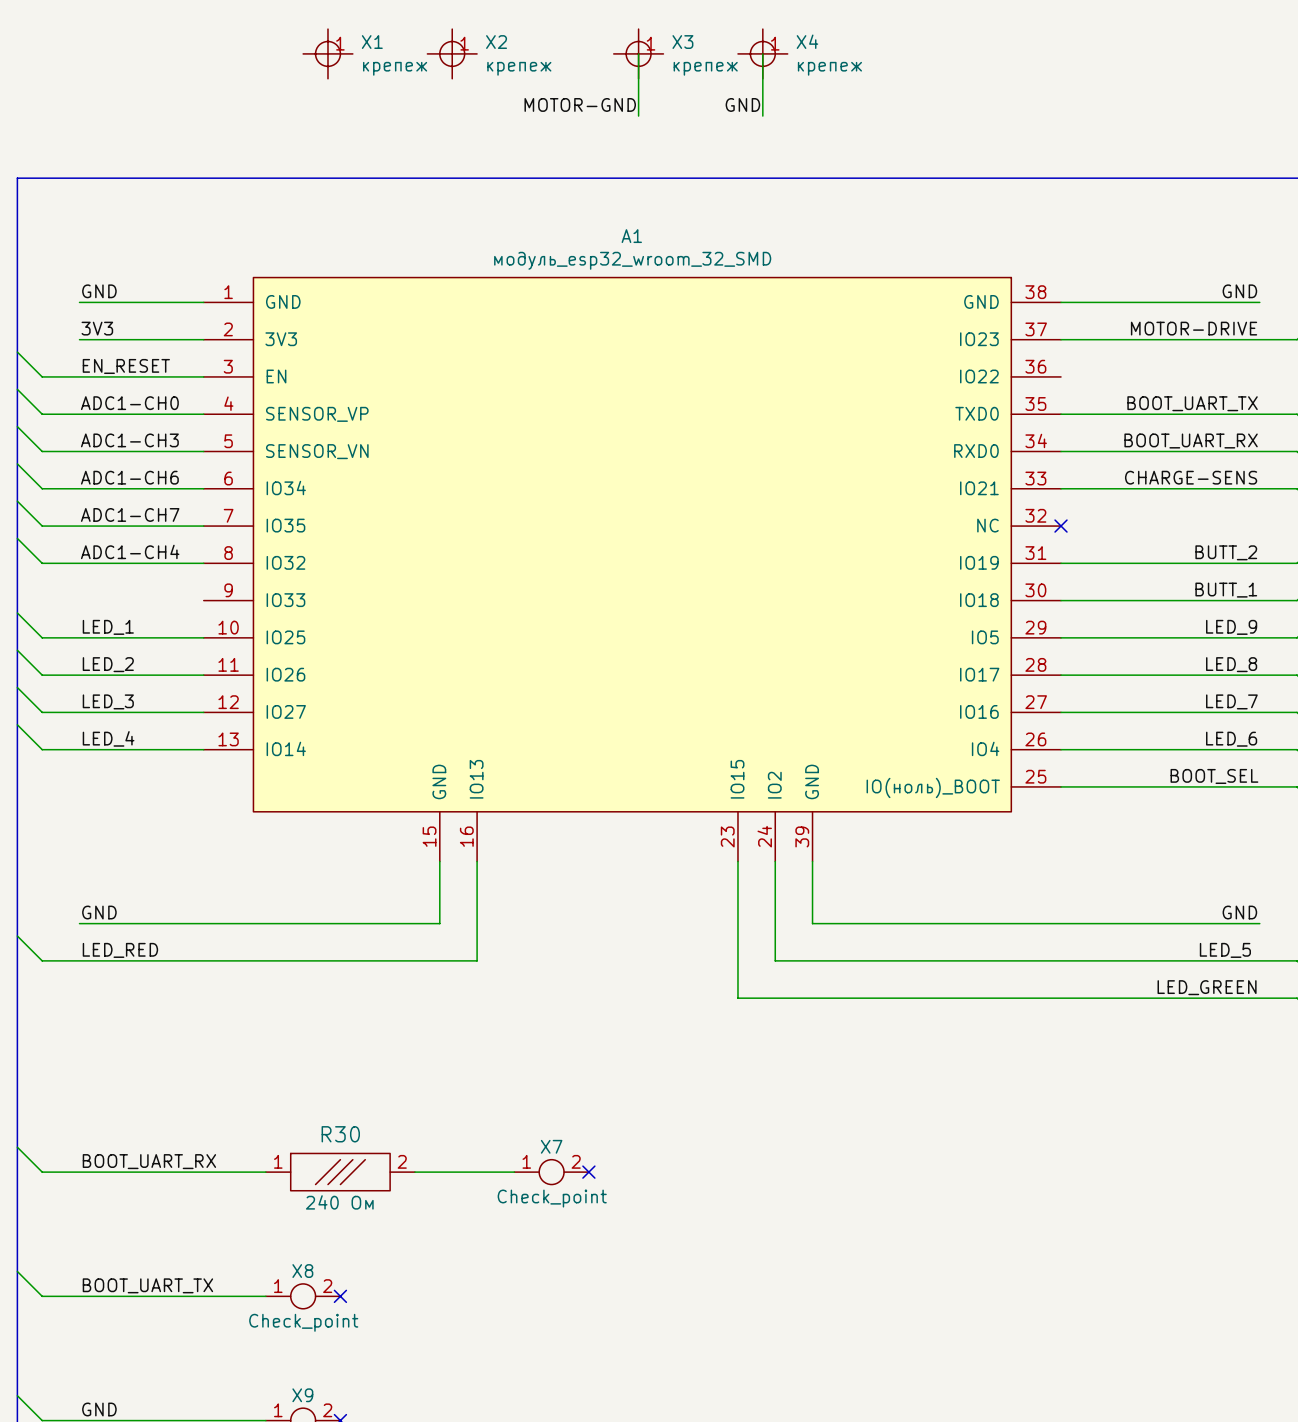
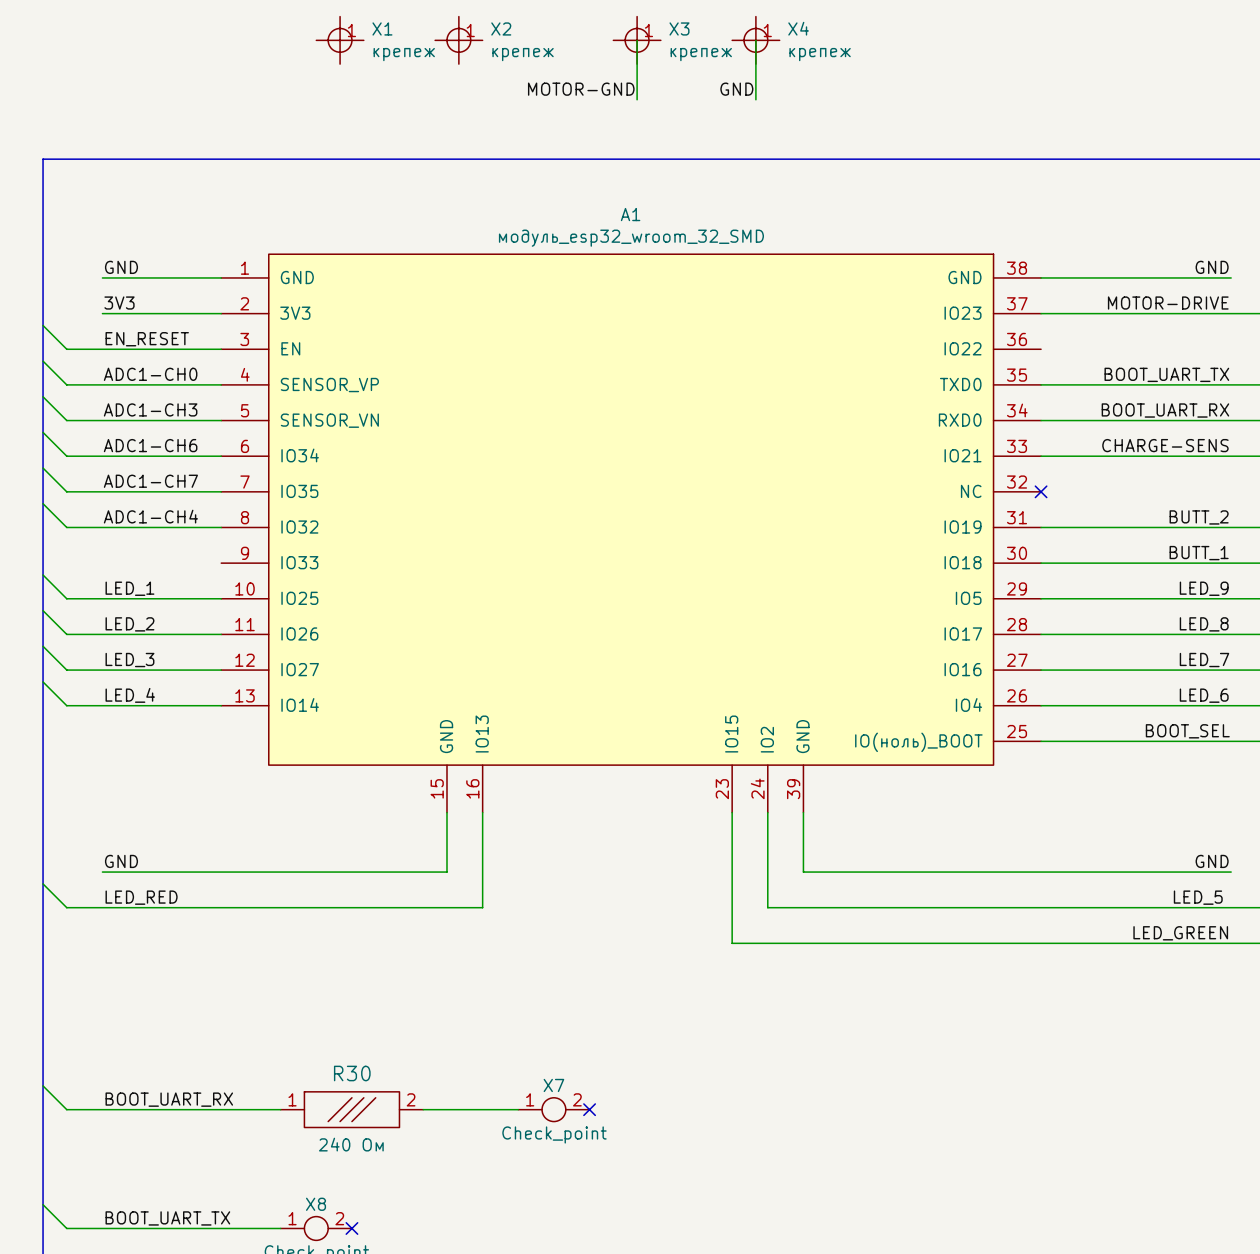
R30 text: 240 Ом (339, 1202) -> none
R30 text: none -> 240 Ом (351, 1144)

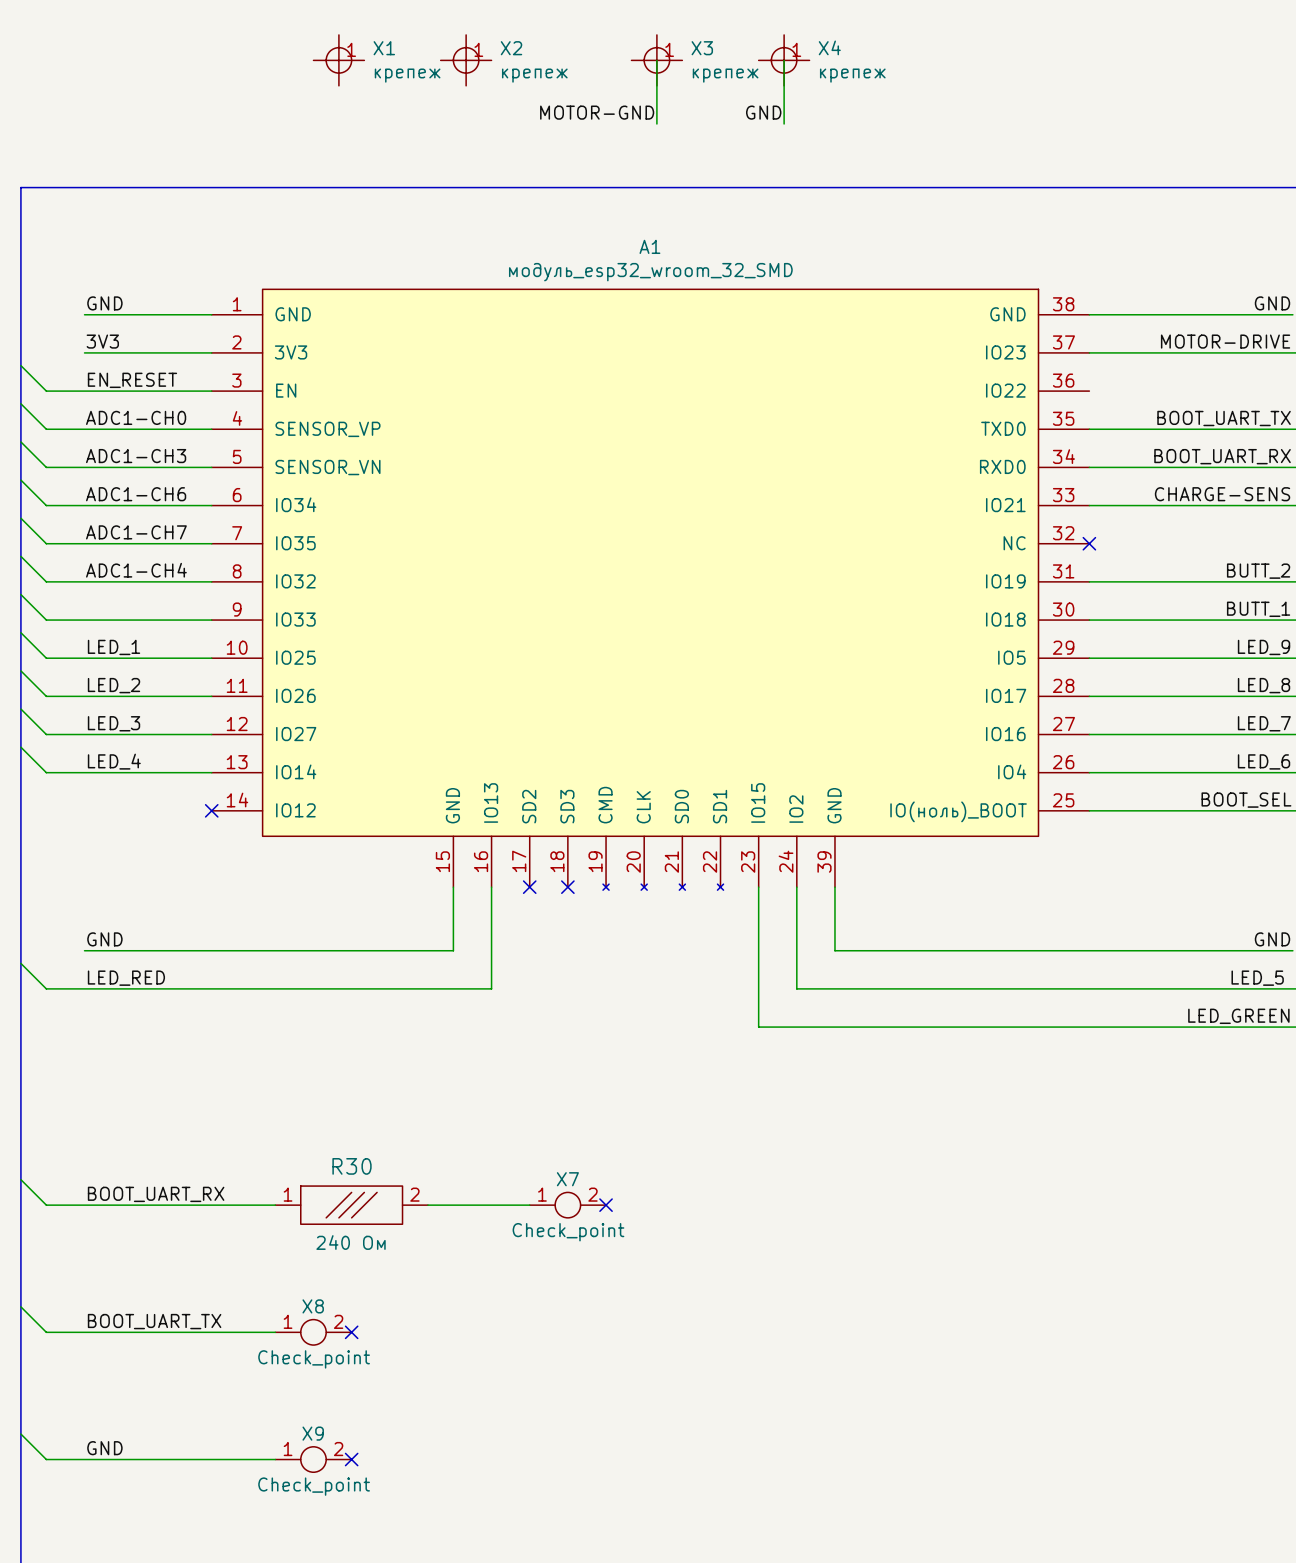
A1 symbol: [221, 254, 1042, 813] -> [211, 289, 1090, 891]
wire: none -> (20, 594) (46, 620) (211, 620)
no-connect mark: none -> (211, 810)
no-connect mark: none -> (529, 887)
no-connect mark: none -> (567, 887)

